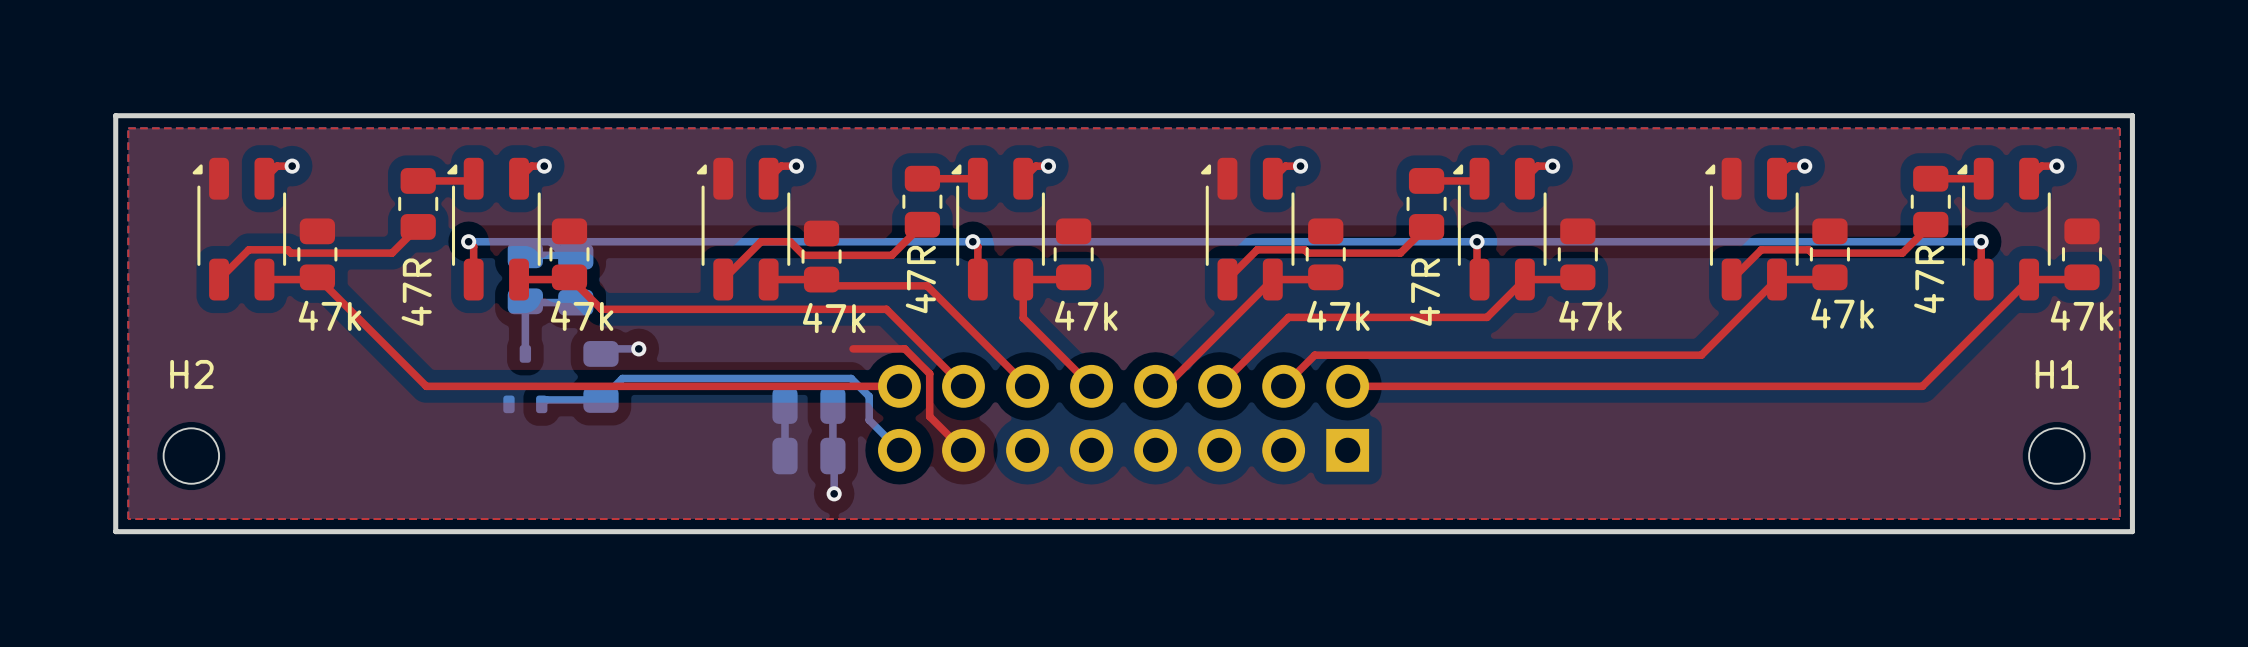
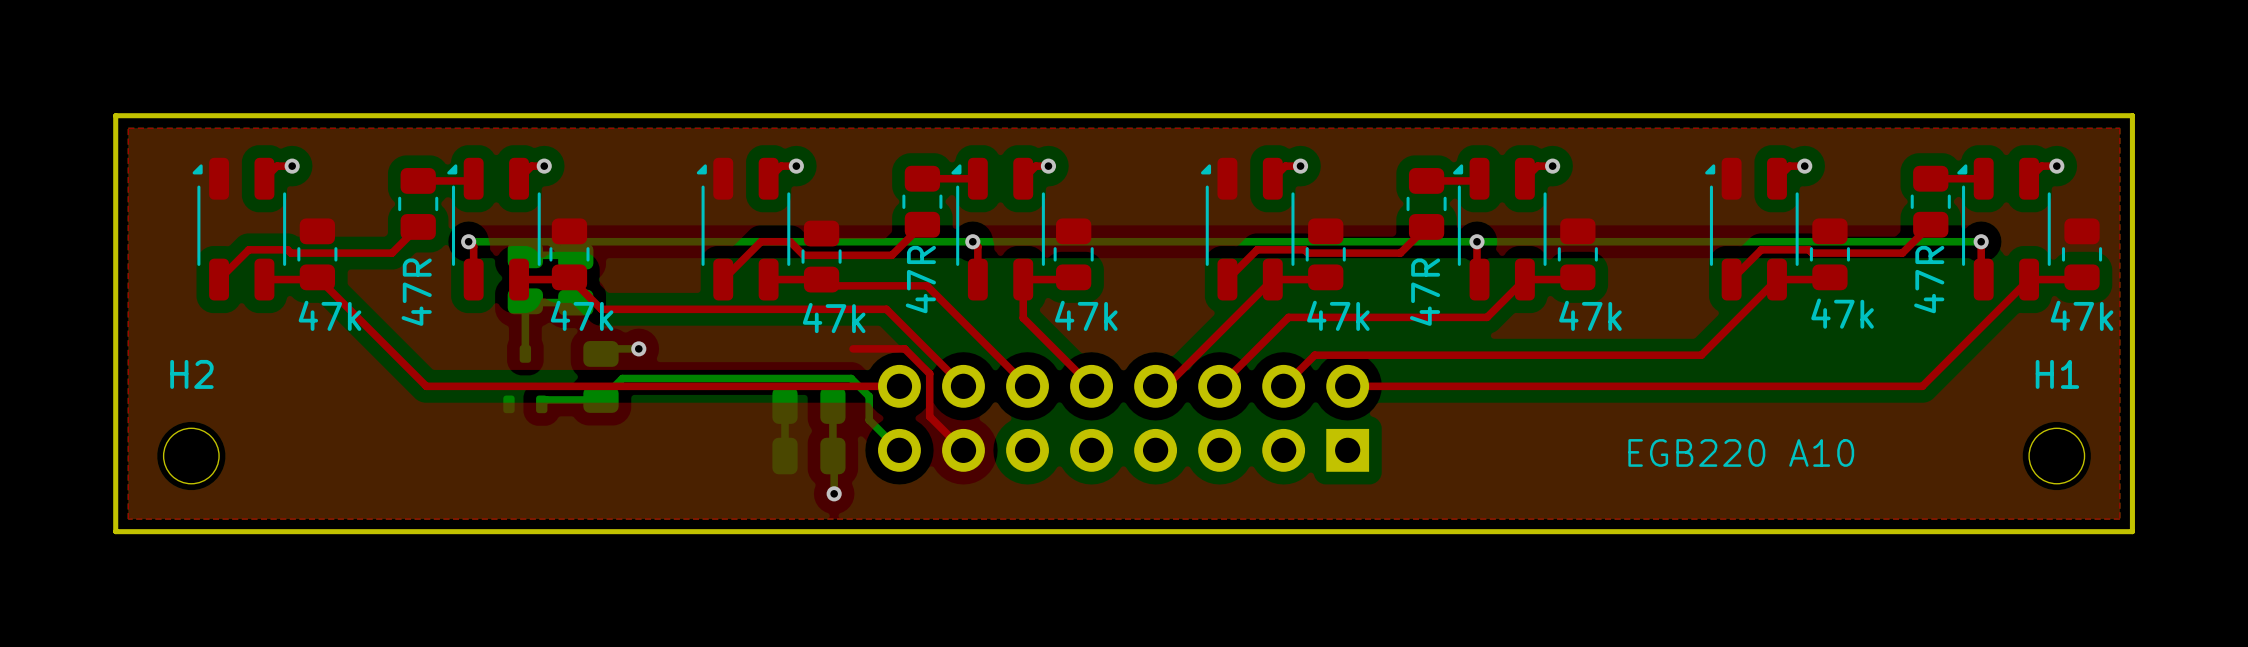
text: none -> EGB220 A10 (1741, 452)

